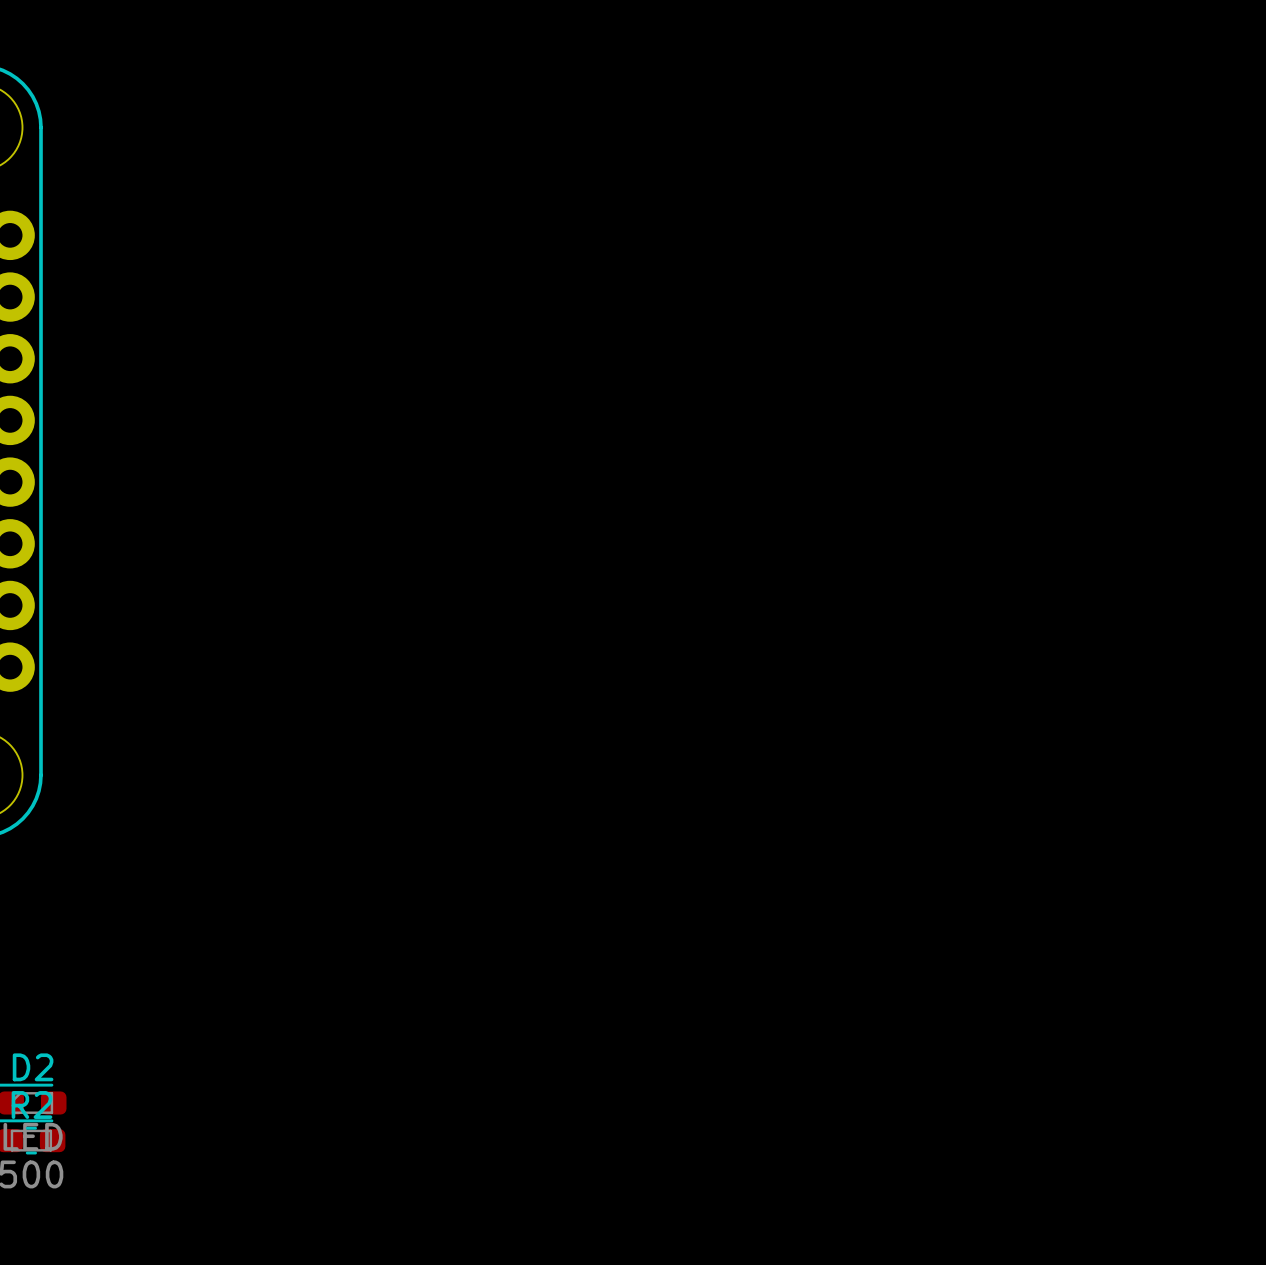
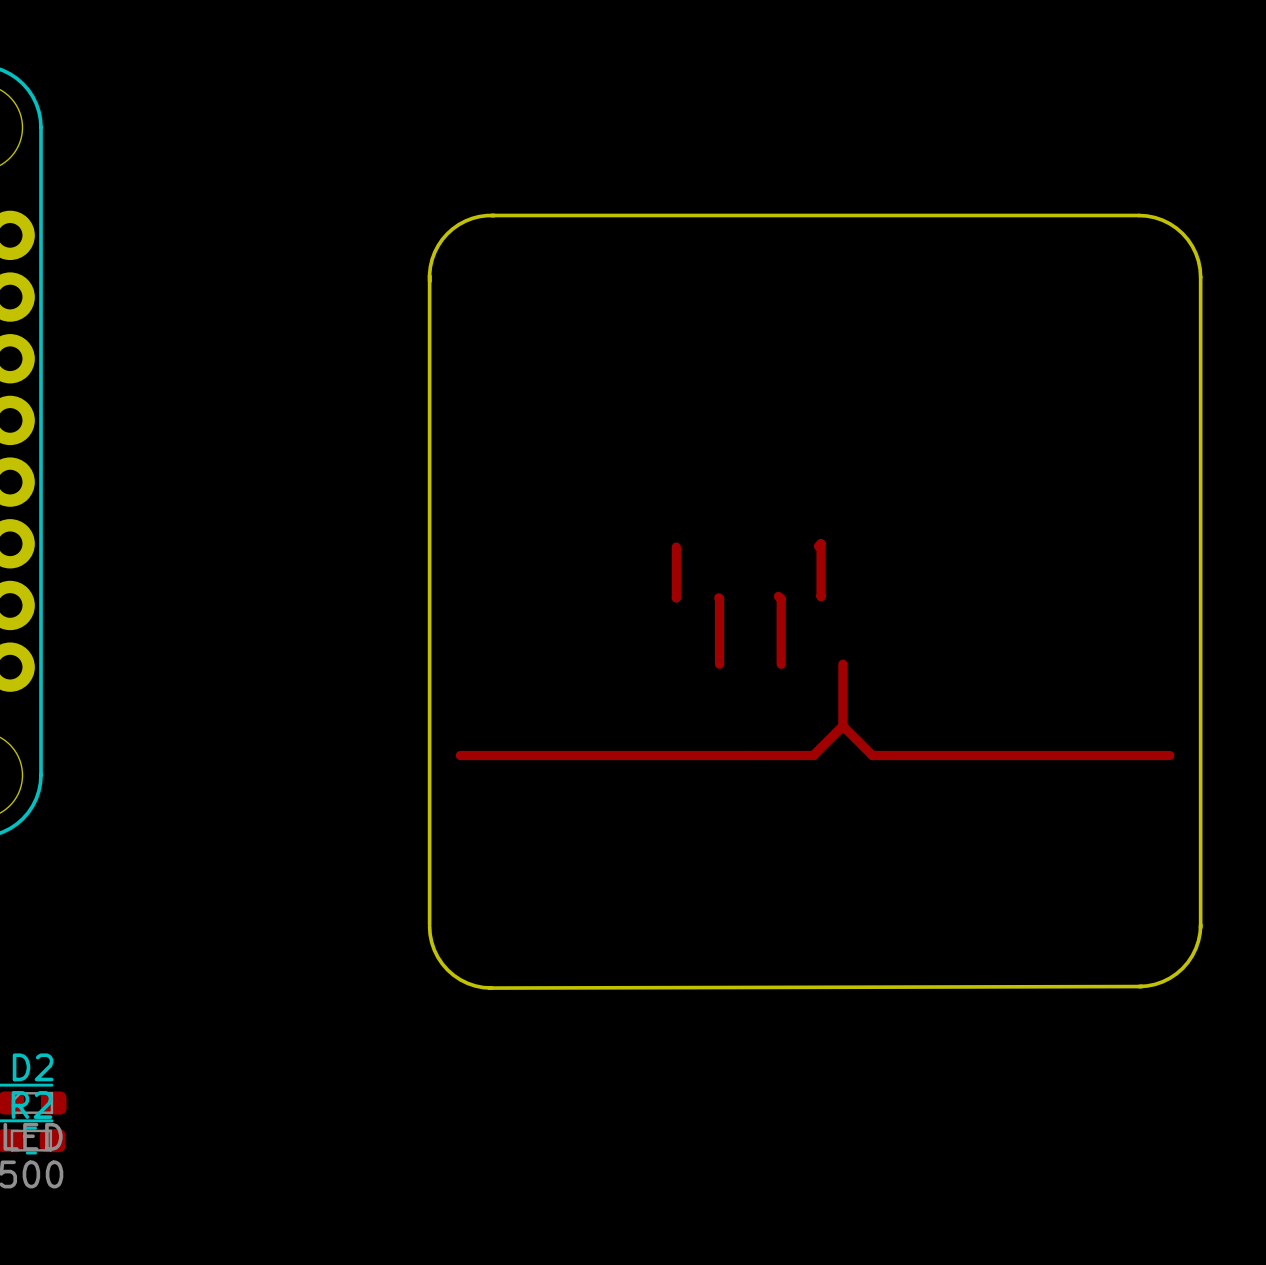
board edge: none -> (491, 215) (1138, 215) (1162, 220) (1182, 233) (1195, 253) (1200, 277) (1200, 927)
board edge: none -> (494, 215) (479, 216) (465, 221) (447, 234) (434, 252) (430, 266) (429, 281)
board edge: none -> (429, 275) (429, 924)
track: none -> (818, 546) (821, 543) (821, 596)
track: none -> (676, 547) (676, 597)
track: none -> (778, 596) (781, 599) (781, 664)
track: none -> (718, 597) (719, 664)
track: none -> (842, 664) (842, 725)
track: none -> (842, 725) (813, 755) (460, 755)
track: none -> (842, 725) (872, 755) (1169, 755)
board edge: none -> (1200, 924) (1195, 948) (1182, 968) (1162, 981) (1138, 986)
board edge: none -> (429, 926) (434, 950) (447, 970) (467, 983) (491, 988)
board edge: none -> (1142, 986) (489, 988)

